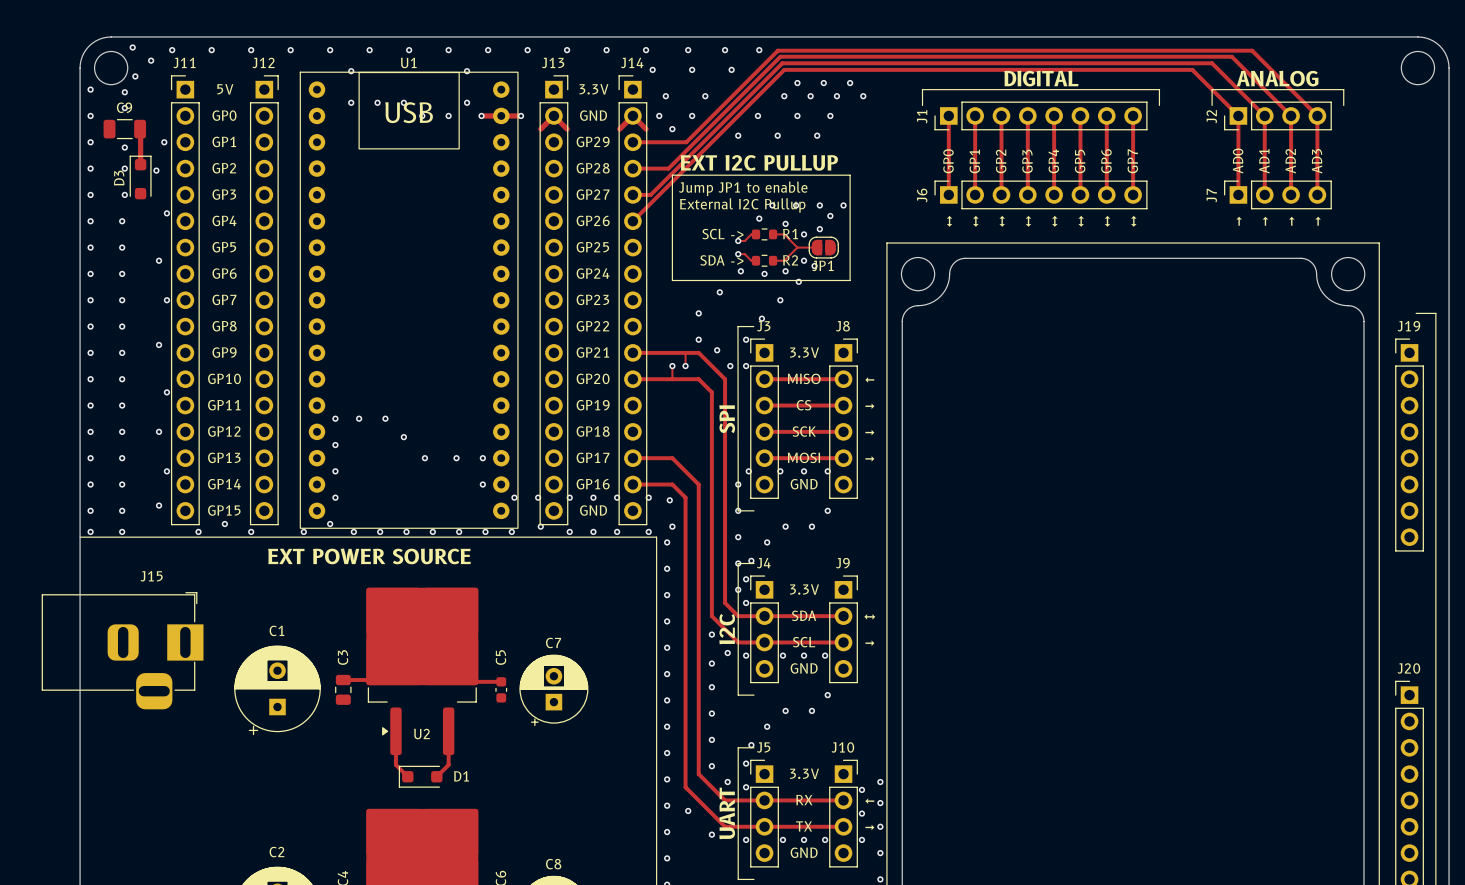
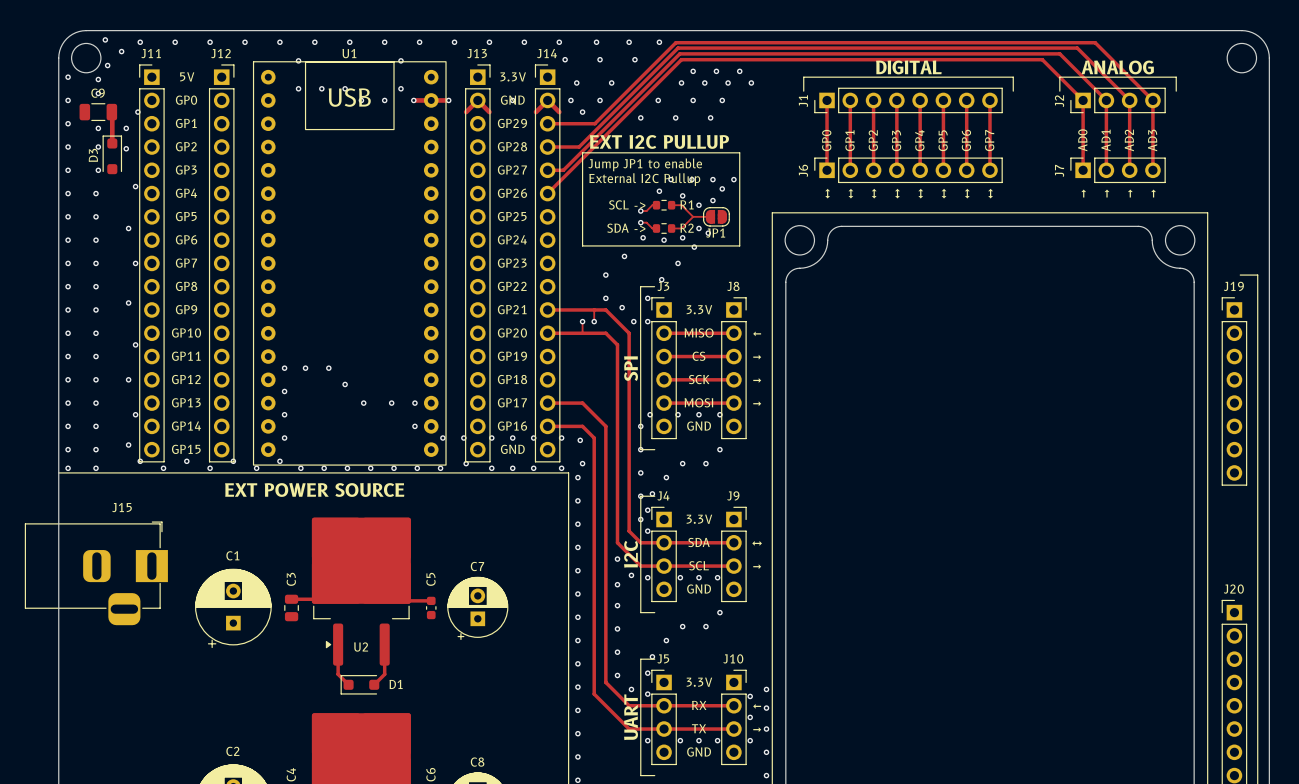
via: none -> (512, 100)
via: none -> (137, 112)
via: (164, 142) -> none
via: none -> (126, 128)
via: none -> (140, 461)
via: none -> (233, 461)
via: (688, 810) -> none
via: (711, 834) -> none

